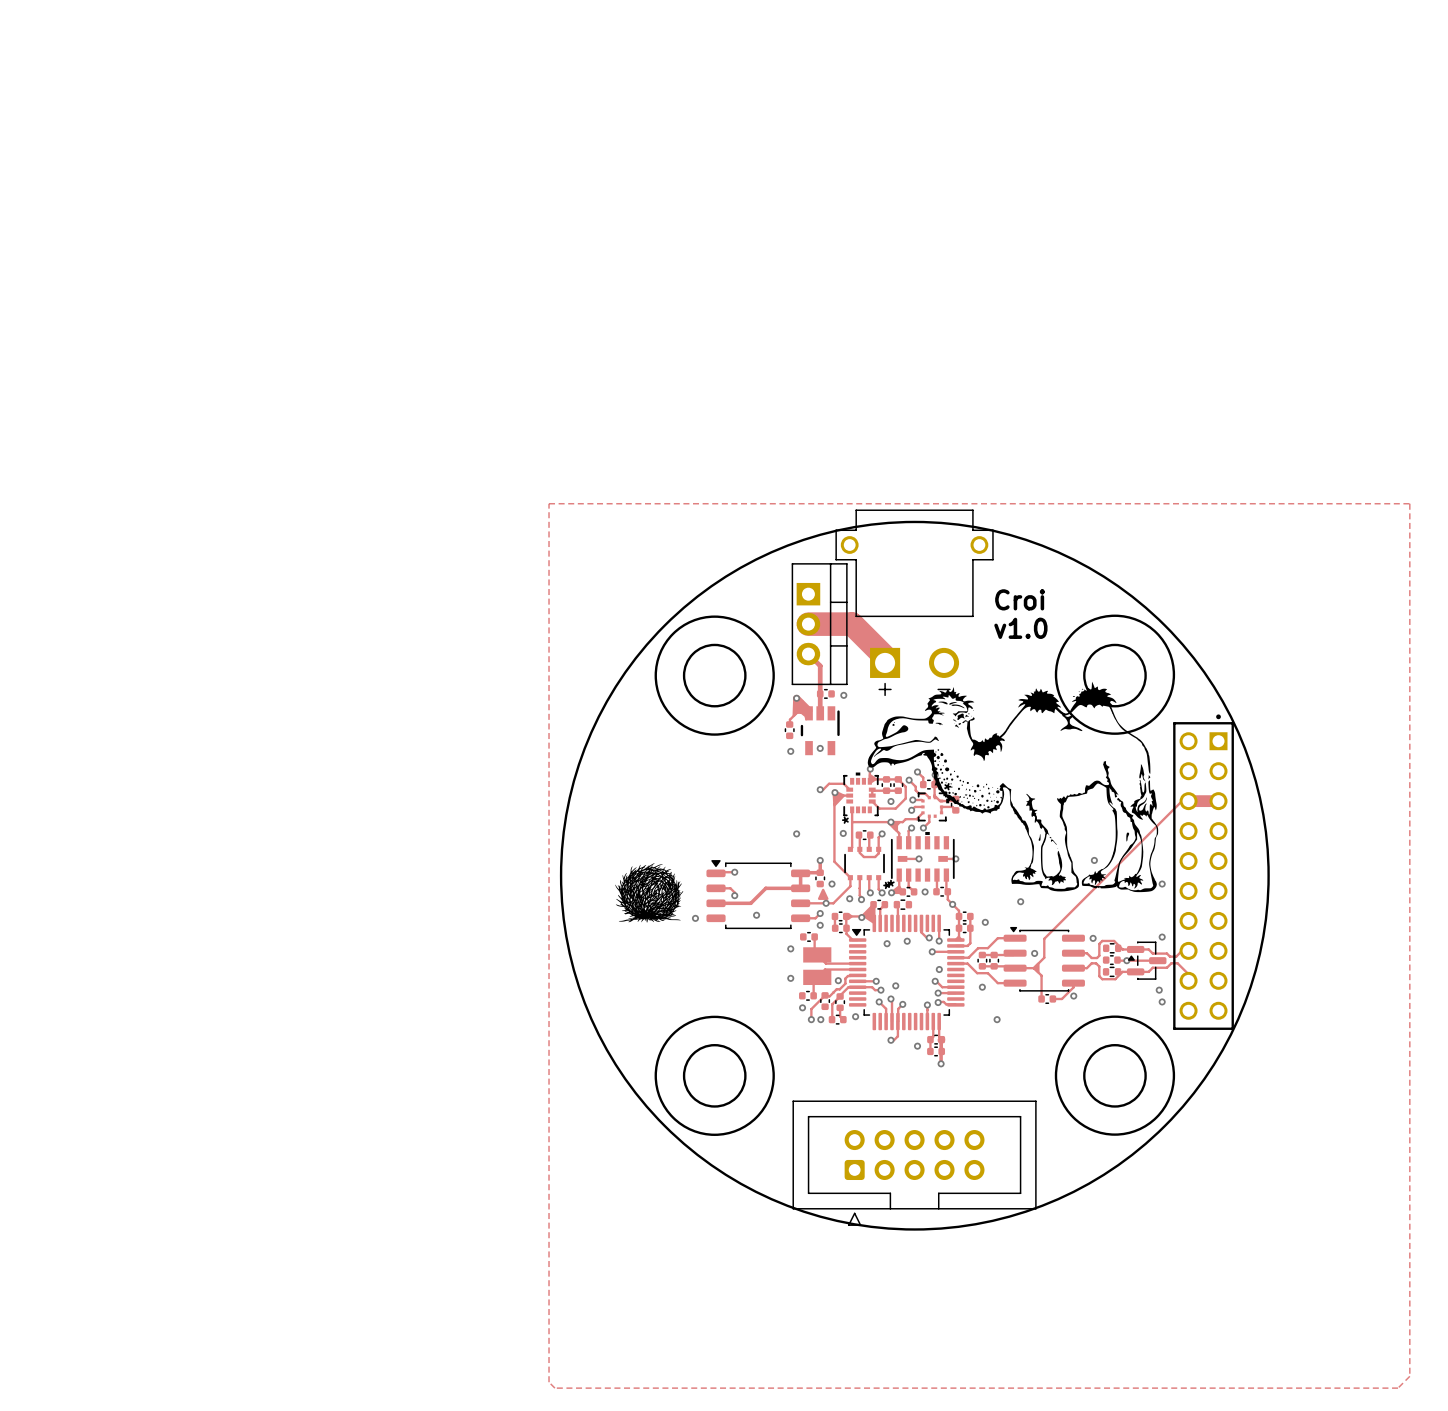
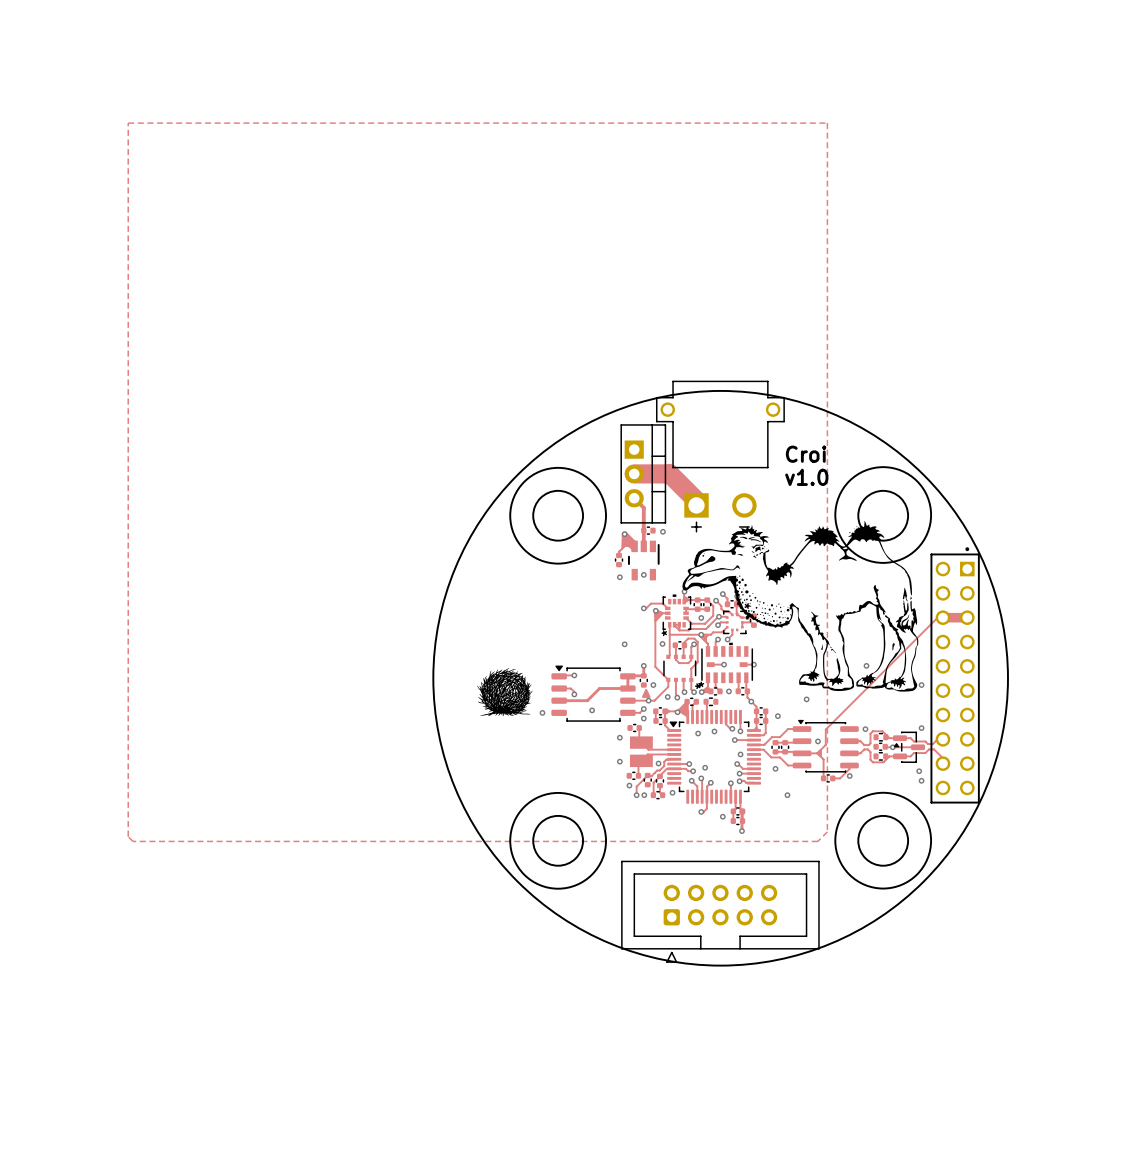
zone outline: none -> (128, 123) (827, 123) (827, 831) (817, 841) (133, 841) (128, 836) (128, 123)
zone outline: (549, 503) (1409, 503) (1409, 1376) (1398, 1388) (554, 1388) (549, 1382) (549, 503) -> none
track: none -> (719, 616) (706, 628) (679, 630) (674, 625) (674, 624) (679, 624) (679, 630)
track: none -> (684, 645) (688, 638) (694, 638) (697, 641) (697, 662) (691, 668) (691, 679)

